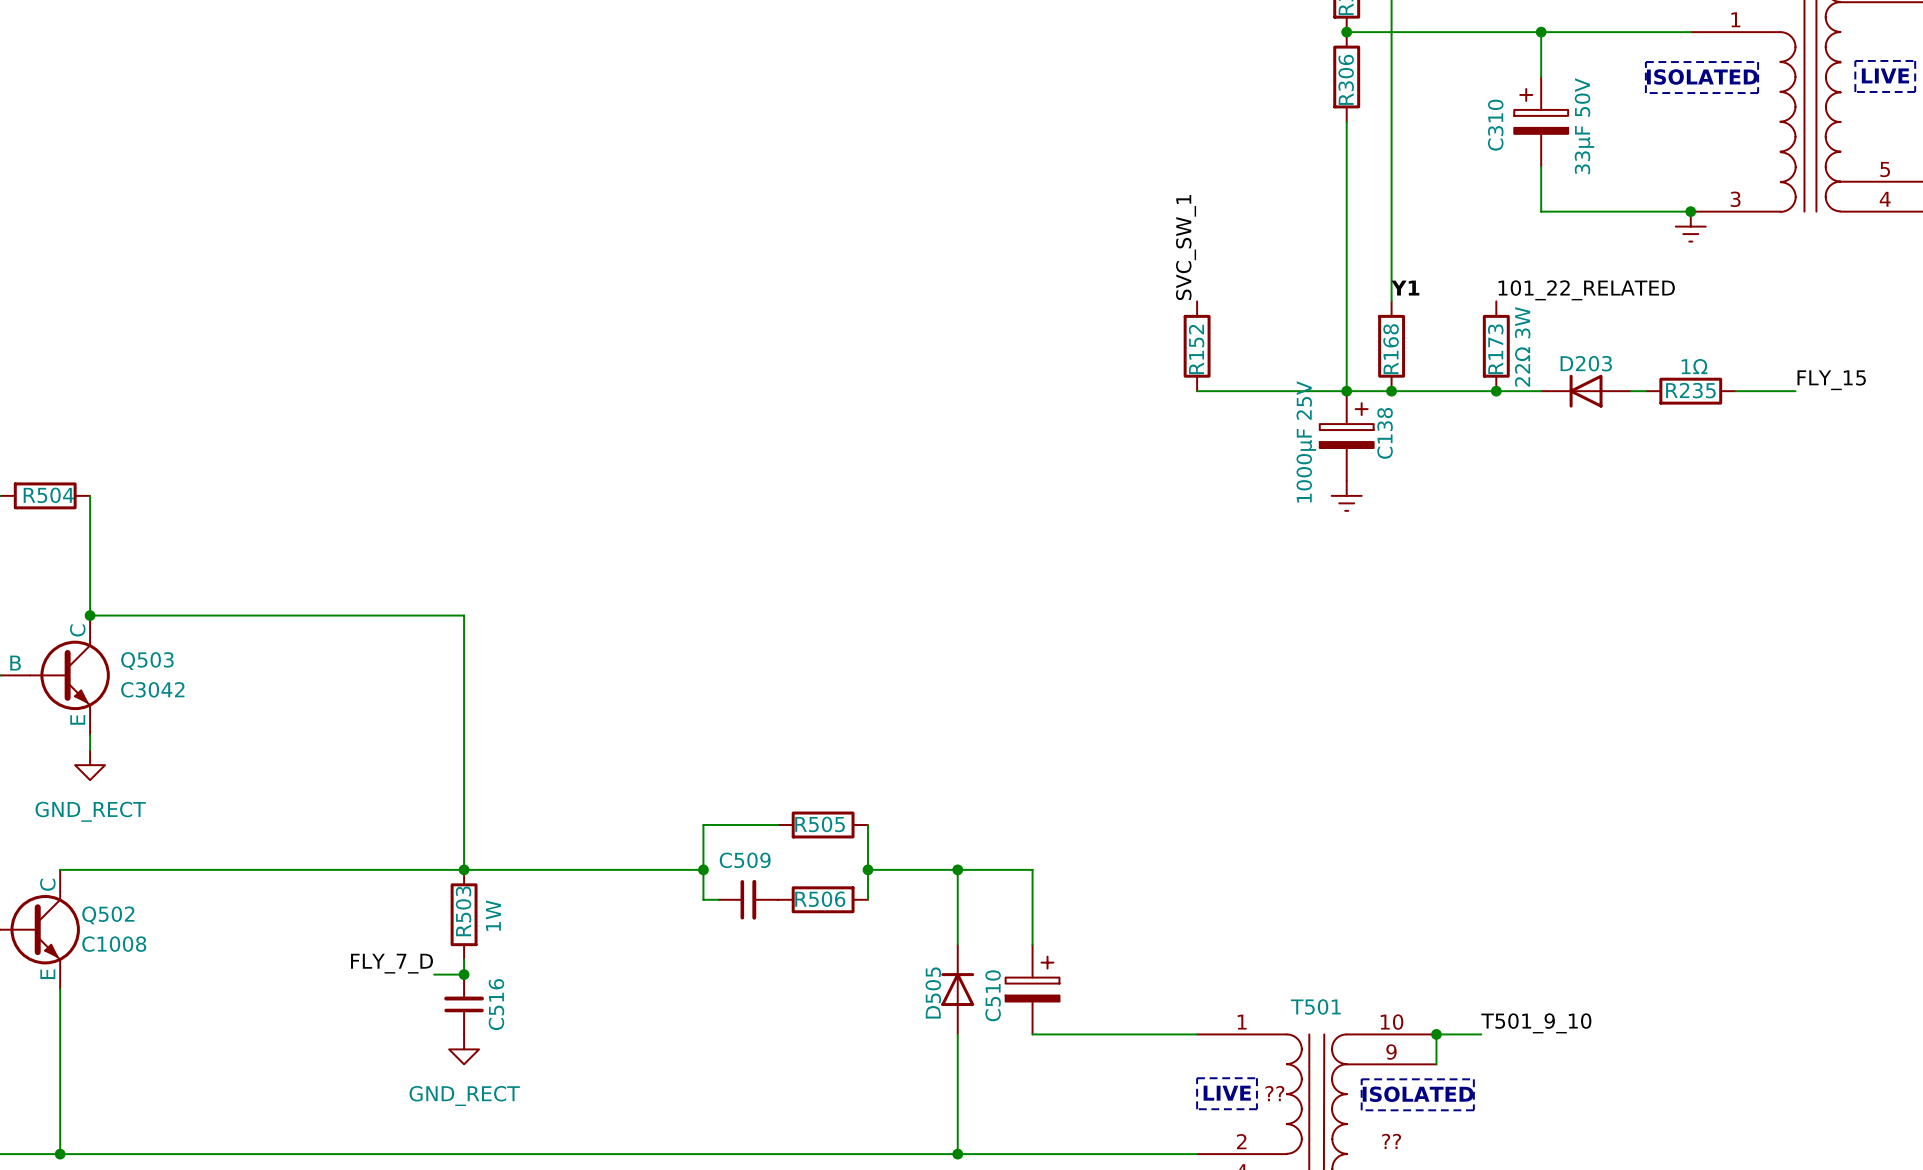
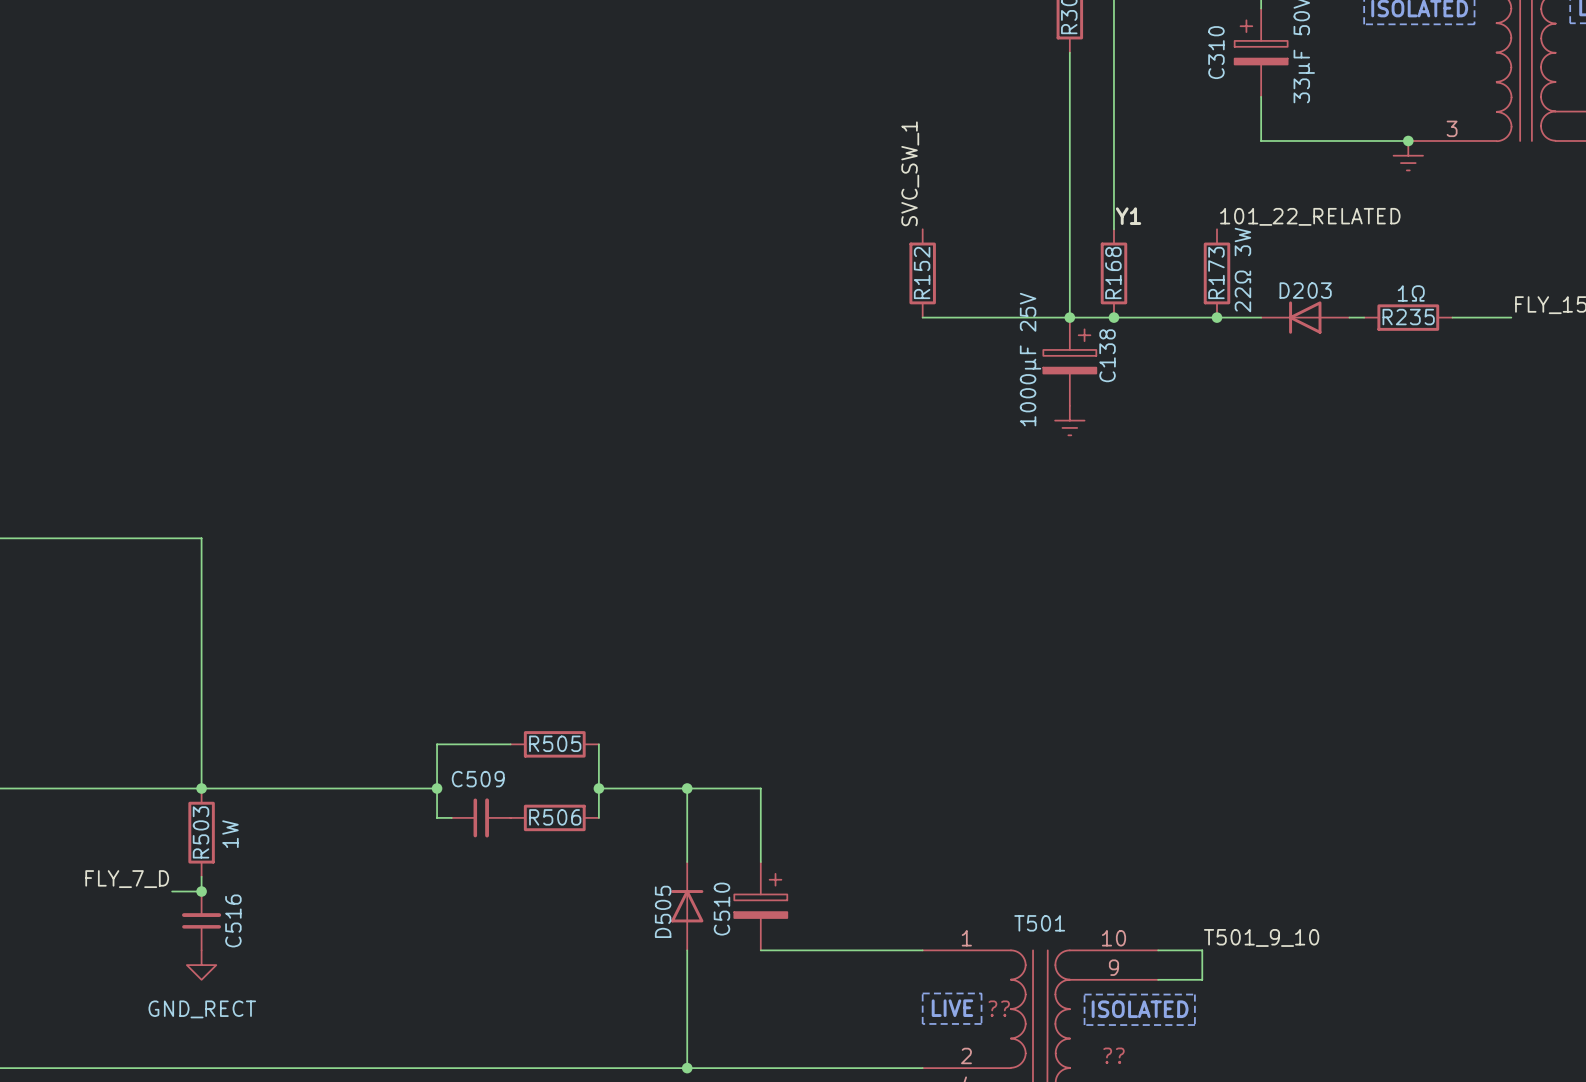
wire: (1436, 1034) (1436, 1064) -> (1202, 950) (1202, 979) (1158, 979)
junction: (1436, 1034) -> none

